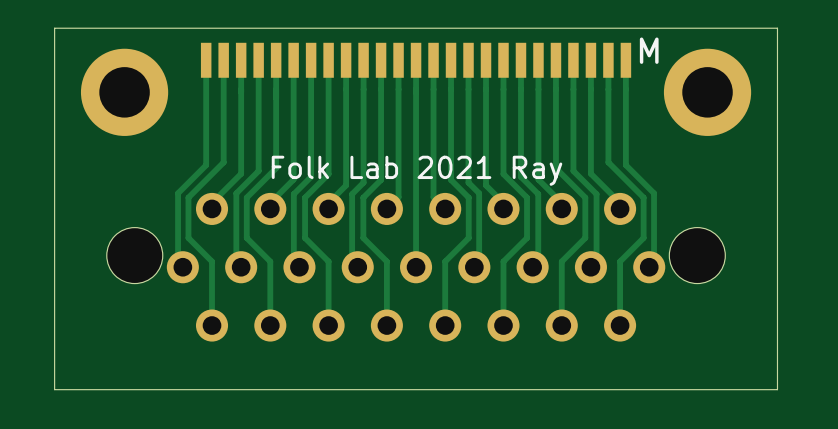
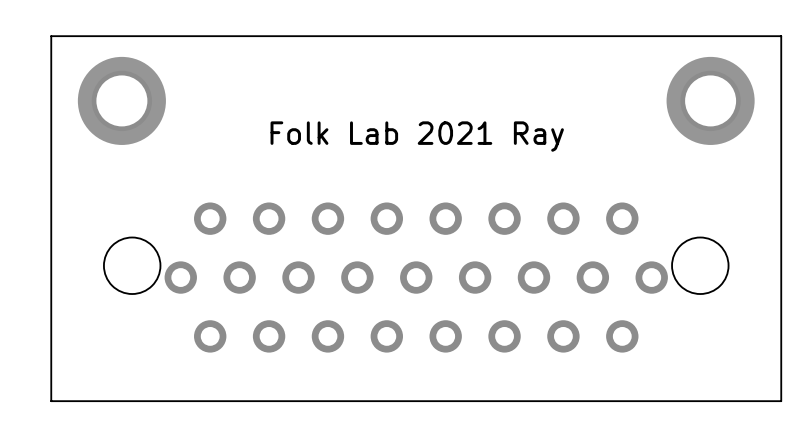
text: M (649, 50) -> none
track: (206, 60) (206, 165) (178, 193) (178, 262) (182, 267) -> none
part: (206, 60) -> none
track: (223, 60) (223, 162) (188, 197) (188, 238) (212, 261) (212, 325) -> none
part: (223, 60) -> none
track: (241, 60) (241, 173) (212, 202) (212, 208) -> none
part: (241, 60) -> none
track: (258, 60) (258, 171) (236, 193) (236, 262) (241, 267) -> none
part: (258, 60) -> none
track: (276, 60) (276, 168) (246, 197) (246, 238) (270, 261) (270, 325) -> none
part: (276, 60) -> none
track: (293, 60) (293, 179) (270, 202) (270, 208) -> none
part: (293, 60) -> none
track: (311, 60) (311, 176) (293, 194) (293, 261) (299, 267) -> none
part: (311, 60) -> none
track: (328, 60) (328, 174) (305, 197) (305, 238) (328, 261) (328, 325) -> none
part: (328, 60) -> none
track: (346, 60) (346, 185) (328, 202) (328, 208) -> none
part: (346, 60) -> none
track: (363, 60) (363, 182) (352, 194) (352, 261) (357, 267) -> none
part: (363, 60) -> none
track: (381, 60) (381, 179) (363, 197) (363, 238) (386, 261) (386, 325) -> none
part: (381, 60) -> none
track: (398, 60) (398, 197) (386, 208) -> none
part: (398, 60) -> none
track: (416, 60) (416, 267) -> none
part: (416, 60) -> none
track: (433, 60) (433, 197) (445, 208) -> none
part: (433, 60) -> none
track: (451, 60) (451, 179) (468, 197) (468, 238) (445, 261) (445, 325) -> none
part: (451, 60) -> none
track: (468, 60) (468, 182) (479, 193) (479, 262) (474, 267) -> none
part: (468, 60) -> none
track: (486, 60) (486, 185) (503, 202) (503, 208) -> none
part: (486, 60) -> none
track: (503, 60) (503, 174) (527, 197) (527, 238) (503, 261) (503, 325) -> none
part: (503, 60) -> none
track: (520, 60) (520, 176) (538, 194) (538, 261) (532, 267) -> none
part: (520, 60) -> none
track: (538, 60) (538, 179) (561, 202) (561, 208) -> none
part: (538, 60) -> none
track: (555, 60) (555, 168) (585, 197) (585, 238) (561, 261) (561, 325) -> none
part: (555, 60) -> none
track: (573, 60) (573, 171) (596, 194) (596, 261) (590, 267) -> none
part: (573, 60) -> none
track: (590, 60) (590, 173) (620, 202) (620, 208) -> none
part: (590, 60) -> none
track: (608, 60) (608, 162) (643, 197) (643, 238) (620, 261) (620, 325) -> none
part: (608, 60) -> none
track: (625, 60) (625, 165) (654, 193) (654, 262) (649, 267) -> none
part: (625, 60) -> none
text position: Folk Lab 2021 Ray (417, 170) -> Folk Lab 2021 Ray (417, 136)

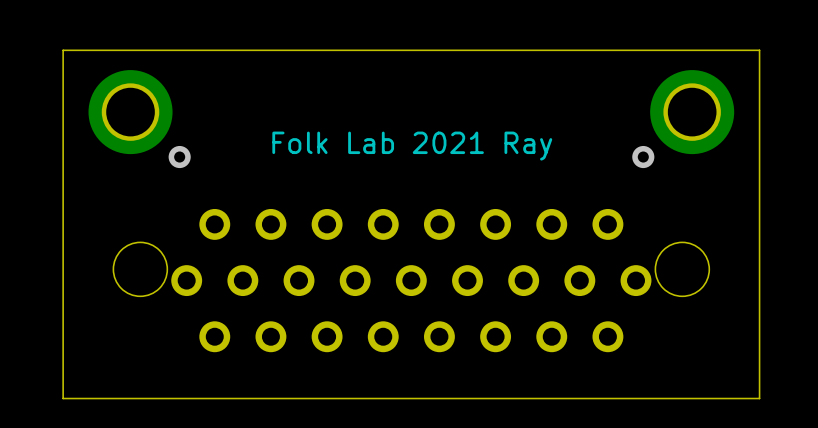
via: none -> (179, 157)
via: none -> (643, 157)

